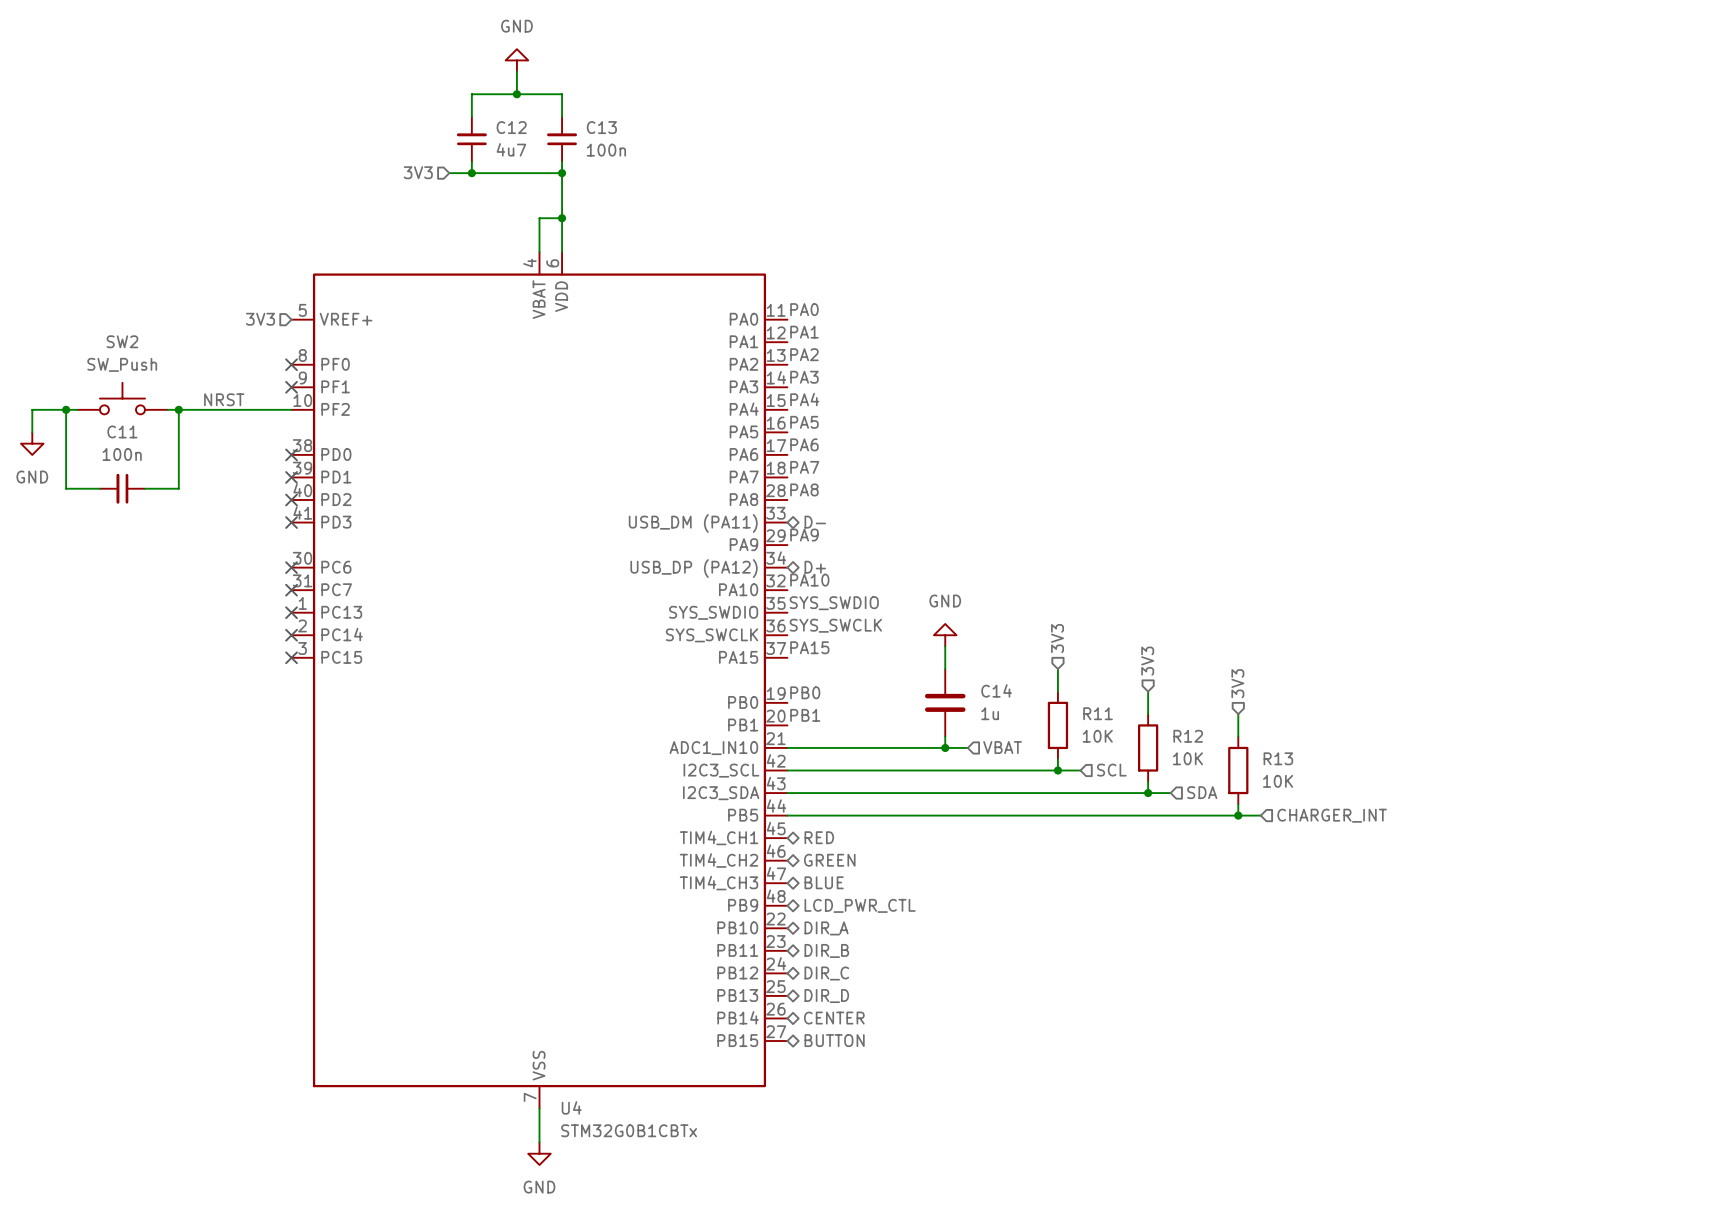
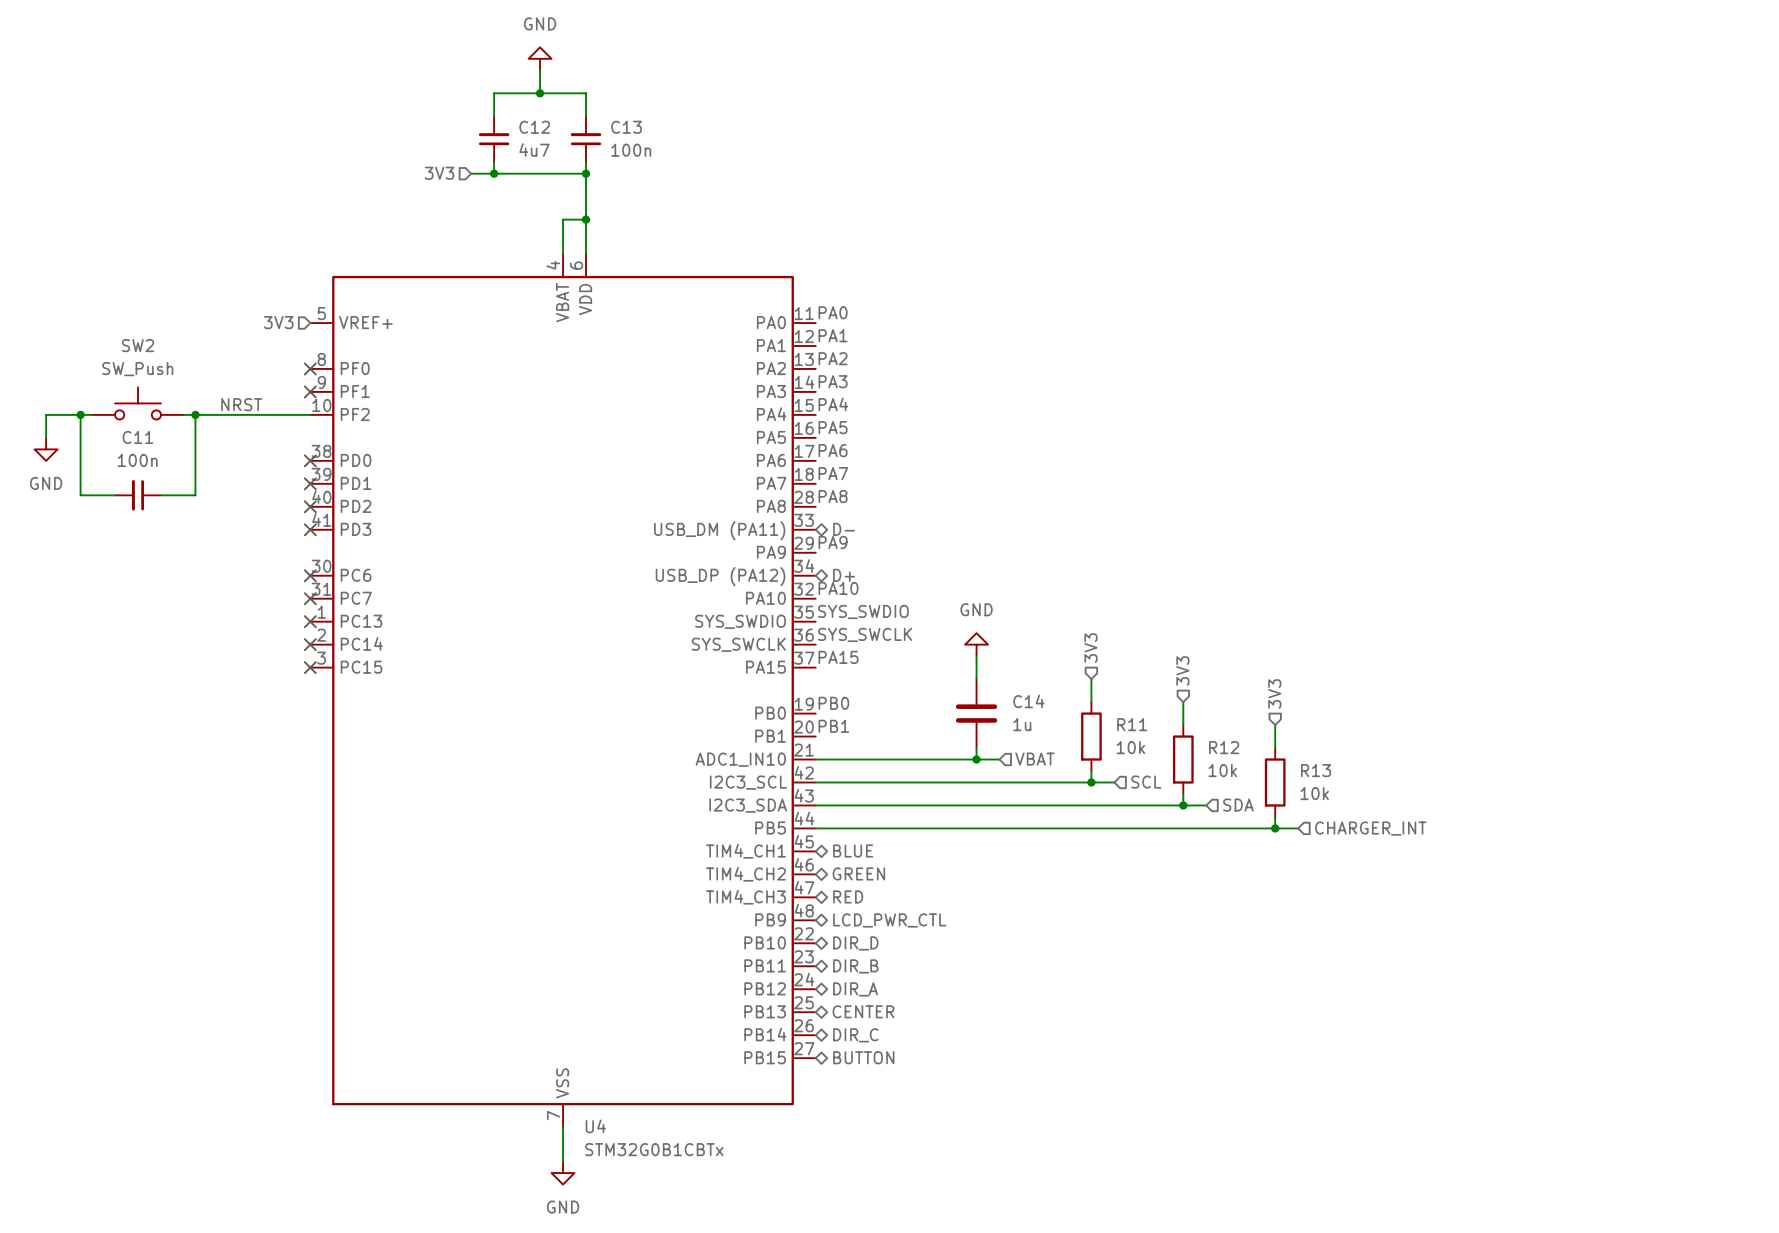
R11 value: 10K (1097, 736) -> 10k (1130, 747)
R12 value: 10K (1187, 758) -> 10k (1222, 770)
R13 value: 10K (1278, 781) -> 10k (1314, 793)
hierarchical label: RED (819, 837) -> BLUE (853, 850)
hierarchical label: BLUE (824, 882) -> RED (848, 896)
hierarchical label: DIR_A (826, 928) -> DIR_D (855, 943)
hierarchical label: DIR_C (826, 973) -> DIR_A (855, 989)
hierarchical label: DIR_D (826, 996) -> CENTER (863, 1011)
hierarchical label: CENTER (834, 1018) -> DIR_C (855, 1035)

